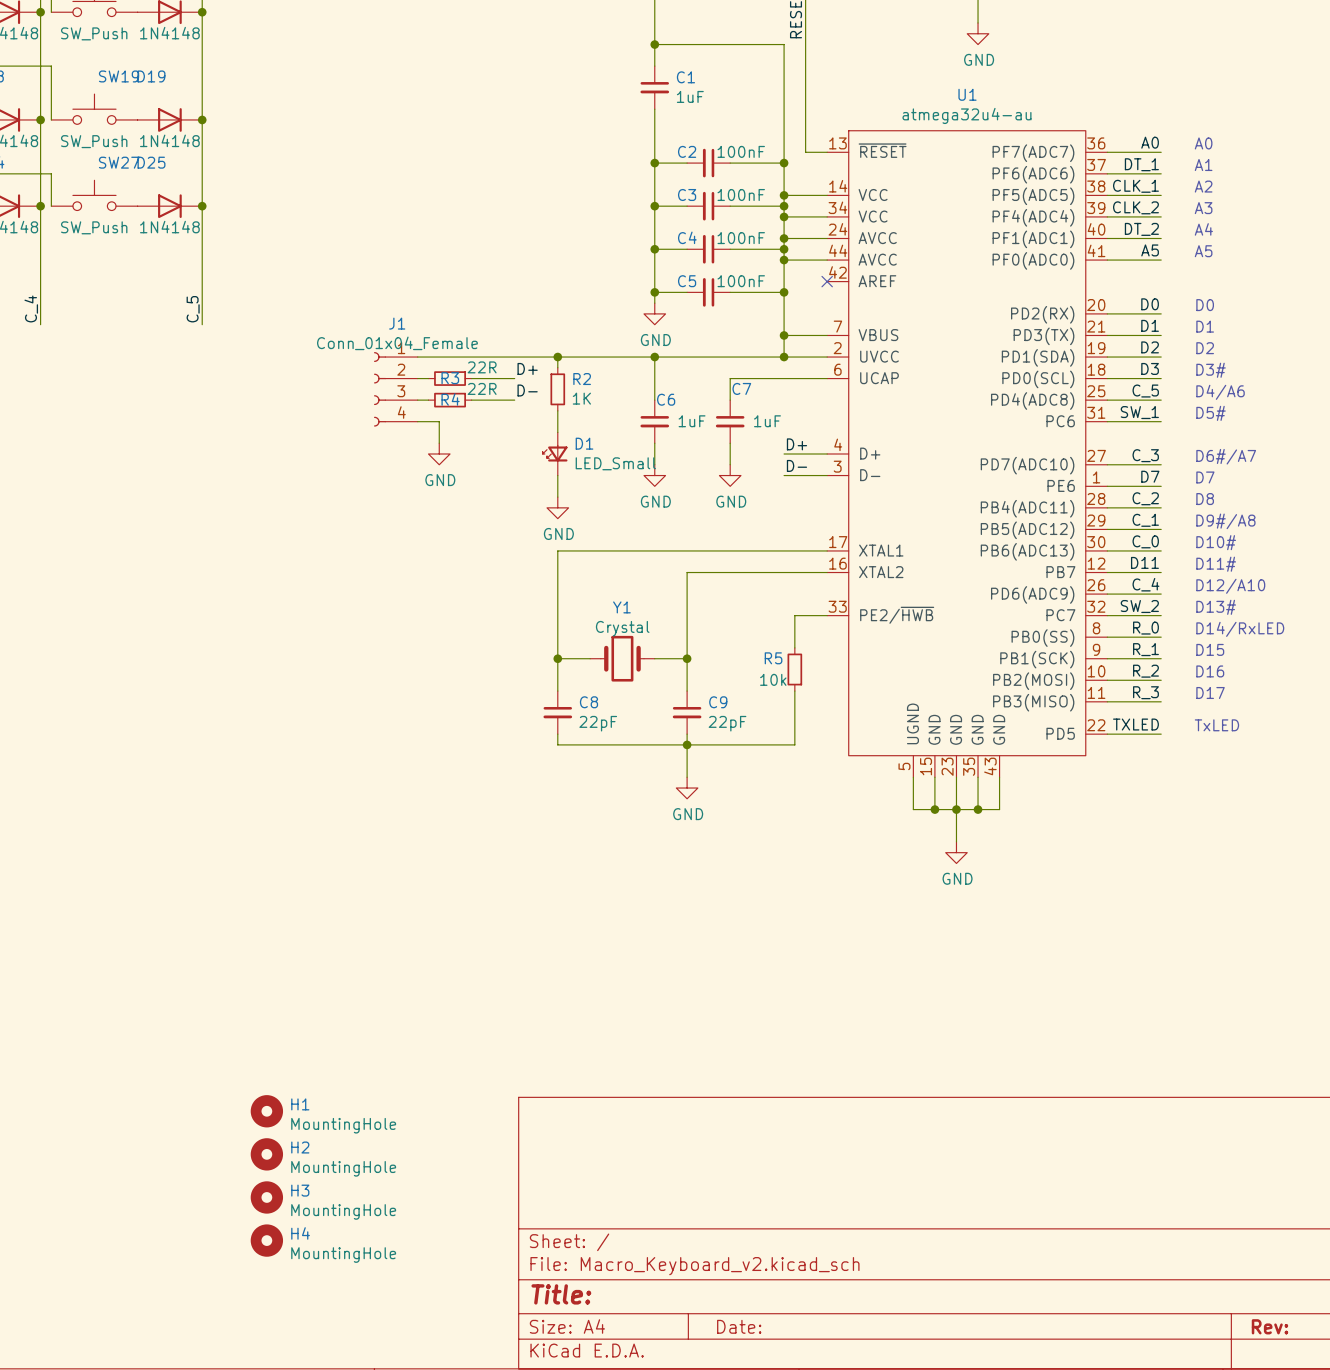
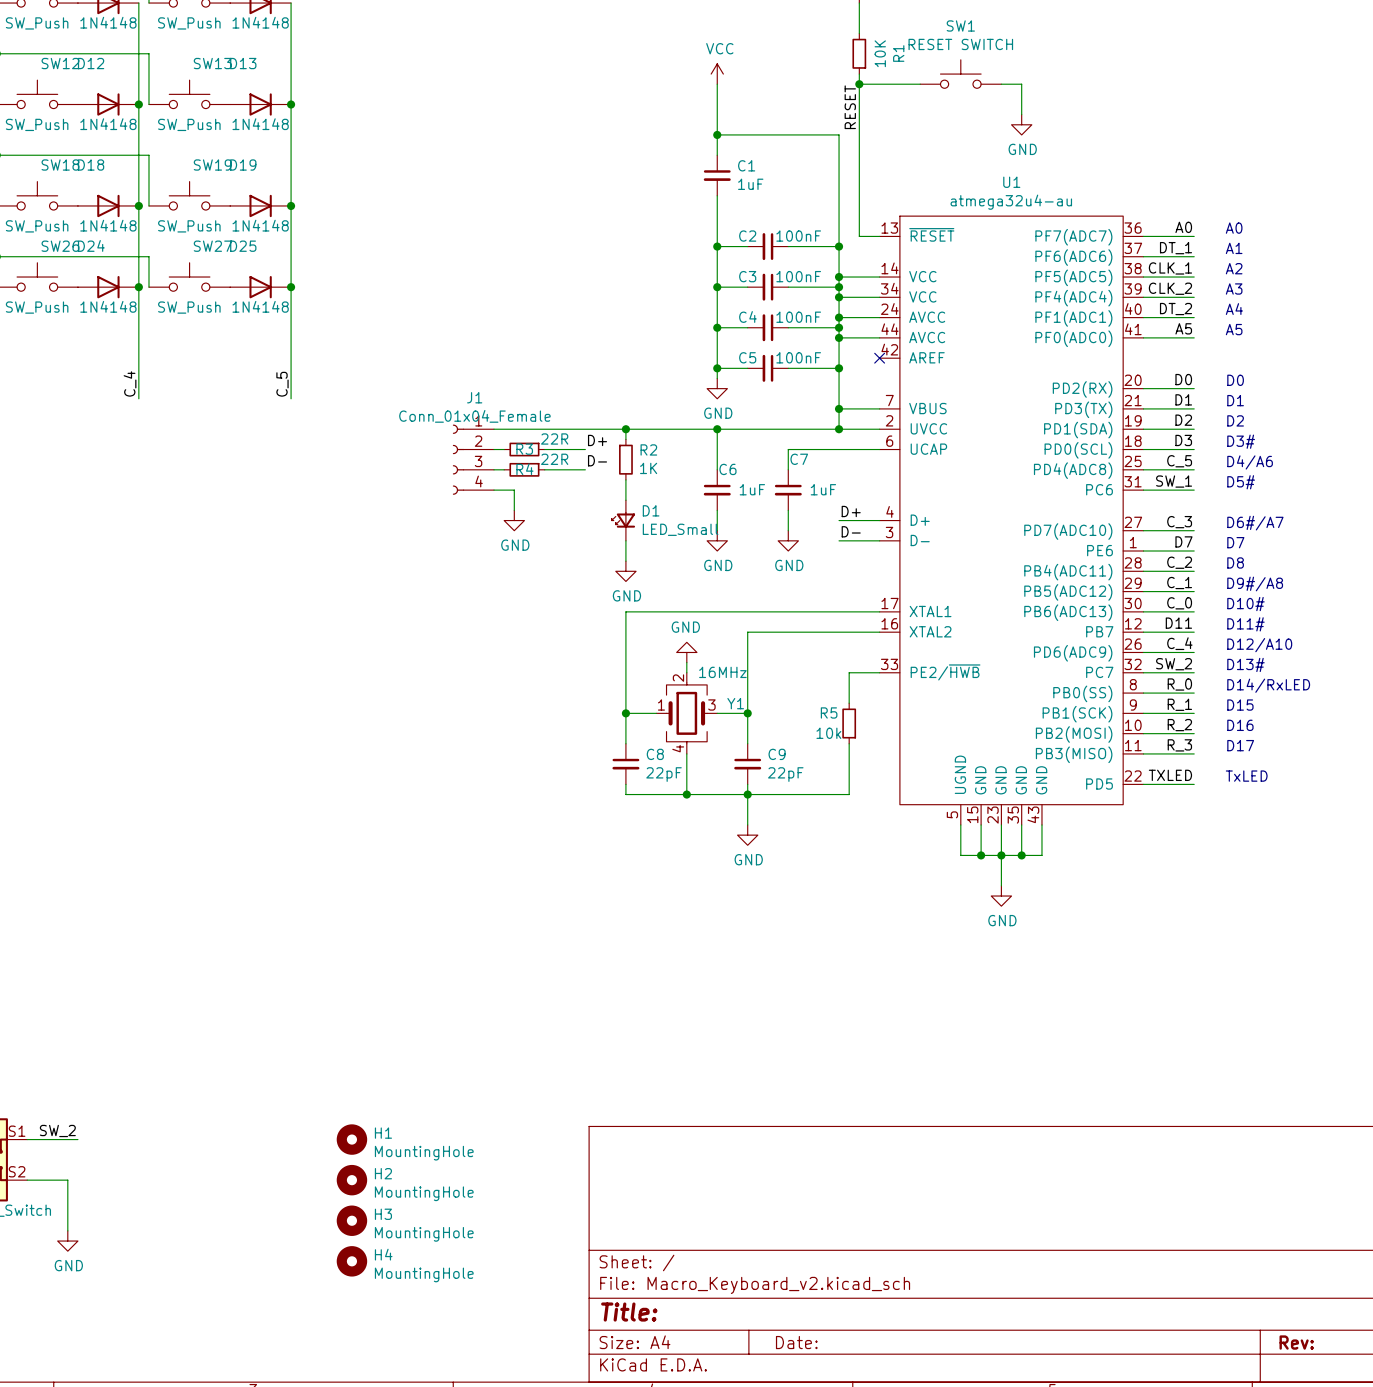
power symbol: none -> GND (686, 652)
wire: none -> (686, 662) (686, 672)
Y1 name position: Y1 (621, 607) -> Y1 (735, 703)
Y1 value: Crystal (622, 628) -> 16MHz (722, 672)
Y1 symbol: [590, 635, 655, 682] -> [656, 672, 718, 754]
wire: none -> (686, 753) (686, 794)
junction: none -> (686, 794)

